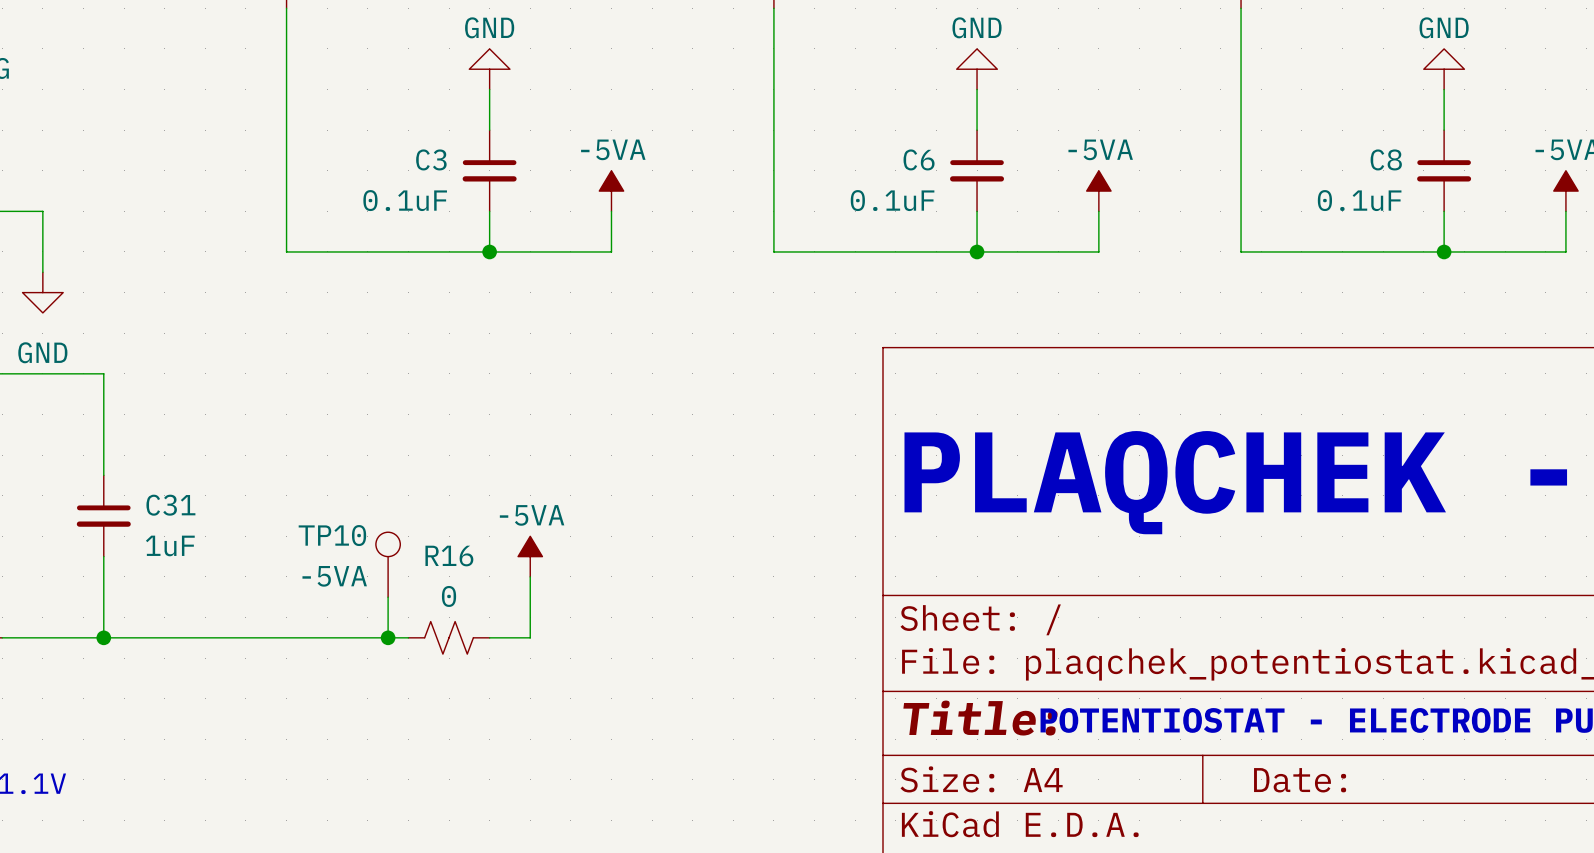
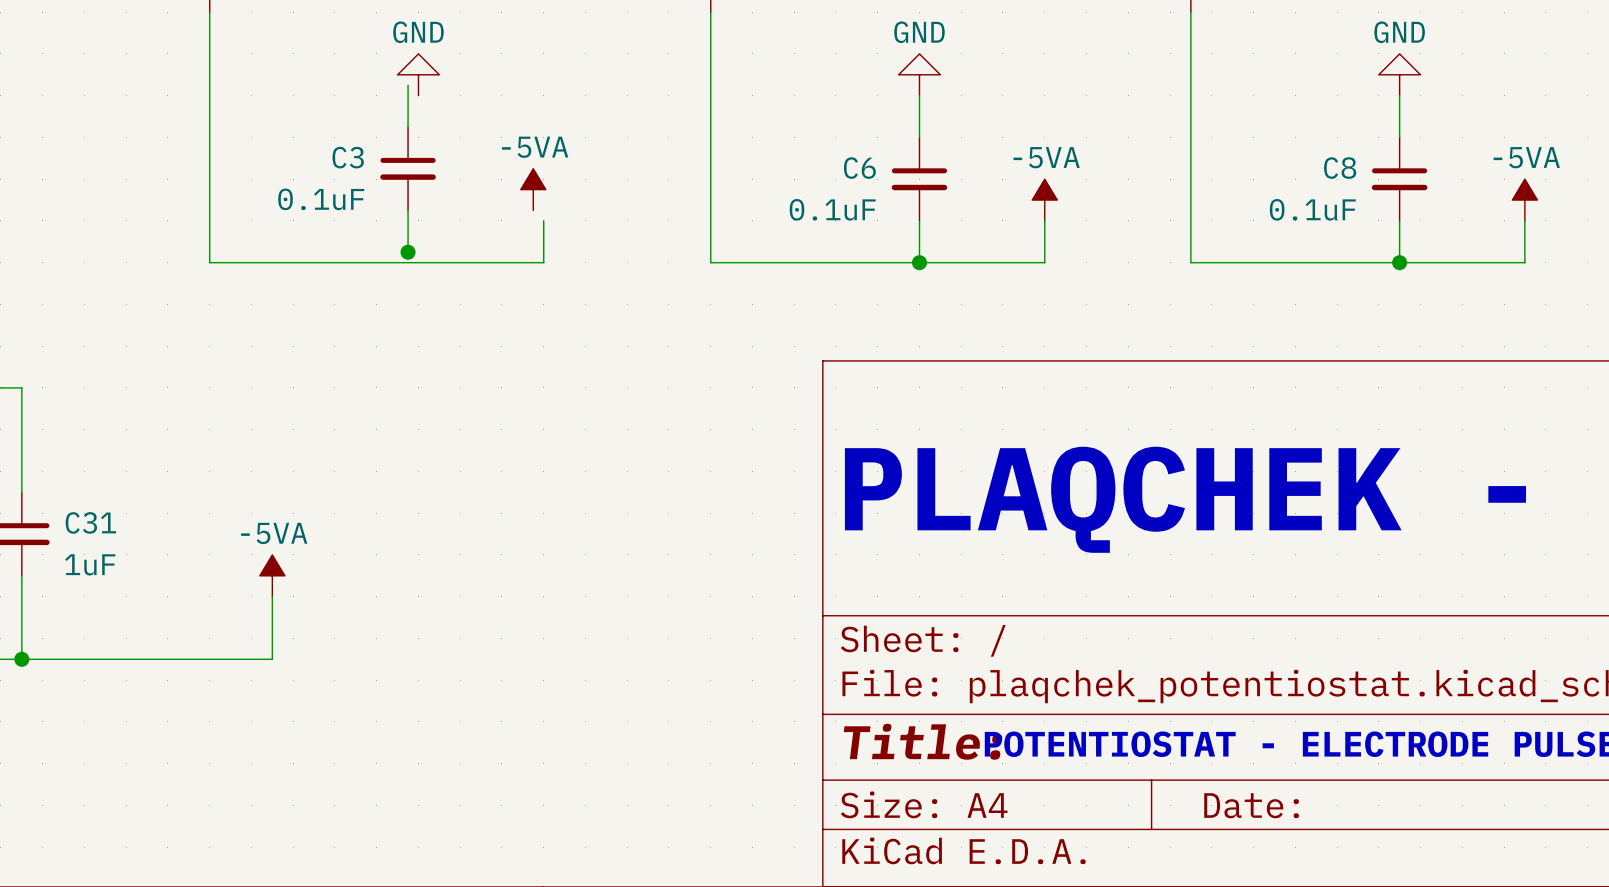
wire: (489, 89) (489, 130) -> (408, 85) (408, 126)
C3 position: (489, 170) -> (408, 168)
power symbol position: -5VA (611, 191) -> -5VA (533, 189)
wire: (489, 211) (489, 251) -> (408, 210) (408, 252)
junction position: (489, 251) -> (408, 252)
power symbol position: -5VA (530, 556) -> -5VA (272, 575)
TP10: -5VA (388, 564) -> none
wire: (530, 576) (530, 637) (489, 637) -> none
wire: (388, 597) (388, 637) -> none
wire: (347, 637) (408, 637) -> (272, 659) (272, 596)
junction: (388, 637) -> none
R16: 0 (449, 637) -> none

